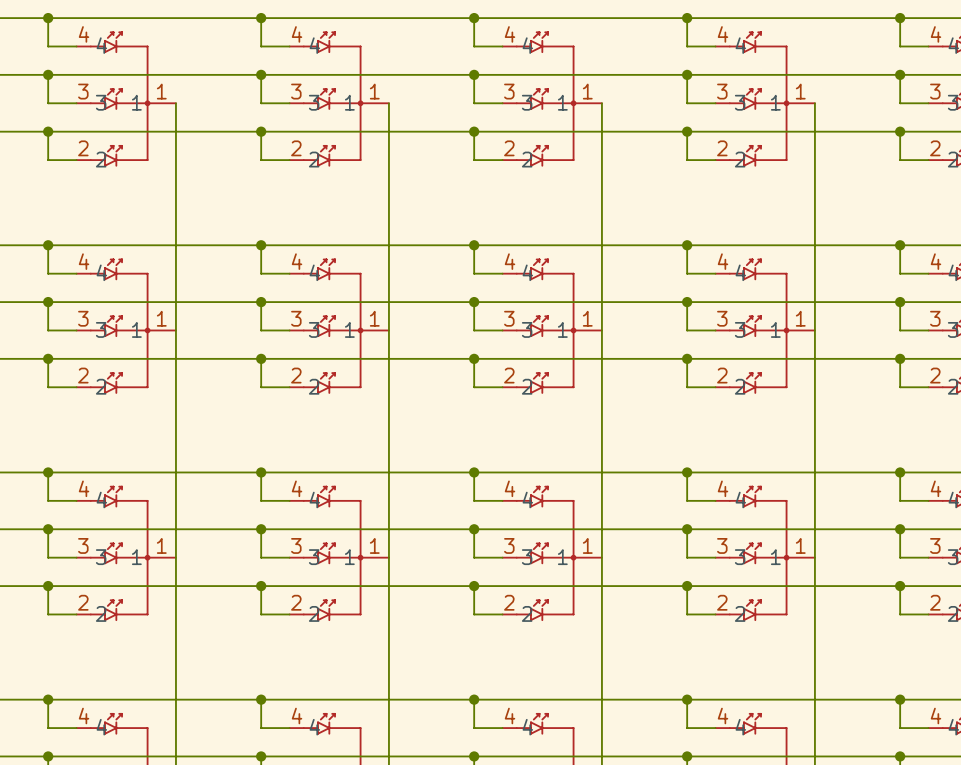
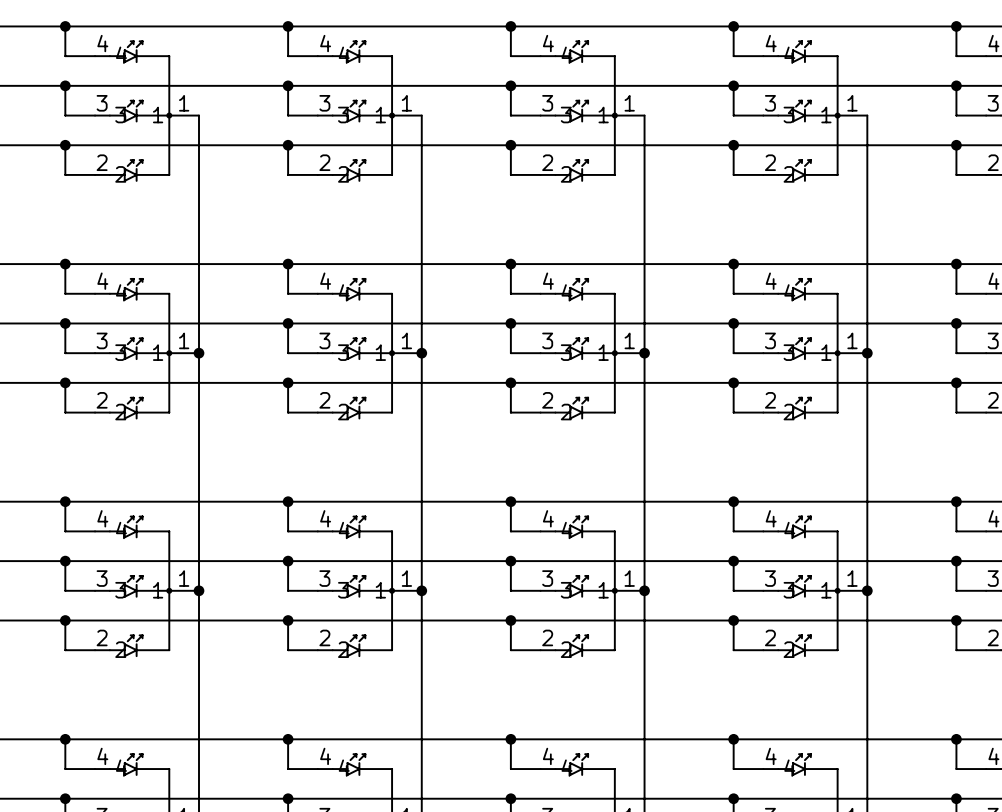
junction: none -> (199, 353)
junction: none -> (421, 353)
junction: none -> (644, 353)
junction: none -> (867, 353)
junction: none -> (199, 590)
junction: none -> (421, 590)
junction: none -> (644, 590)
junction: none -> (867, 590)

